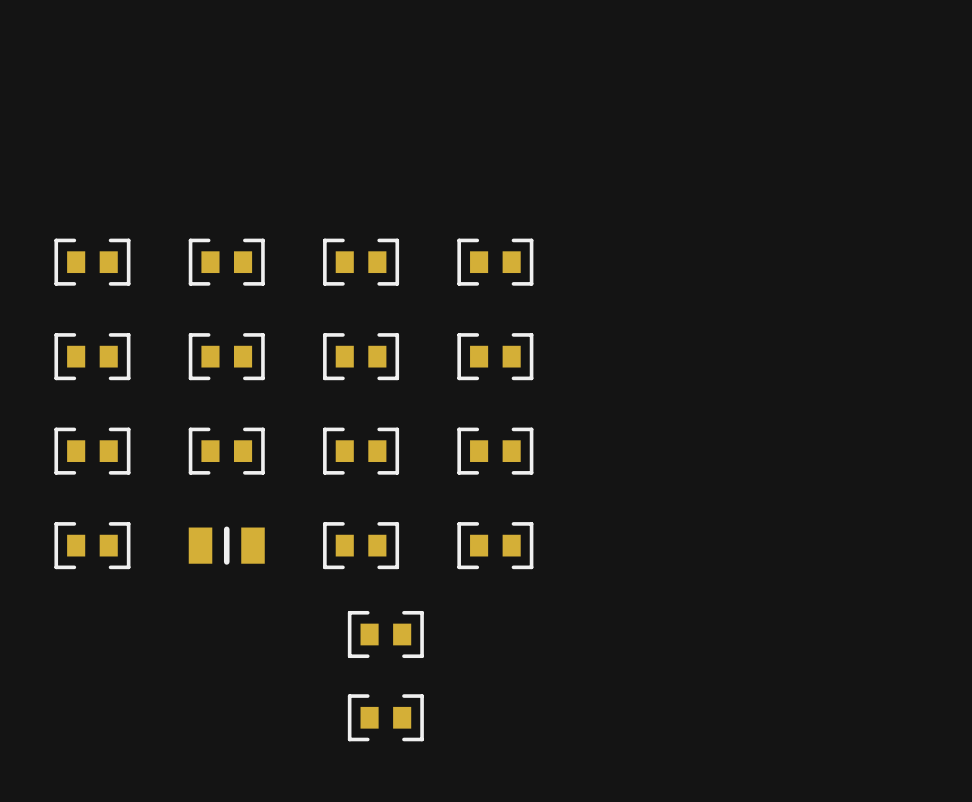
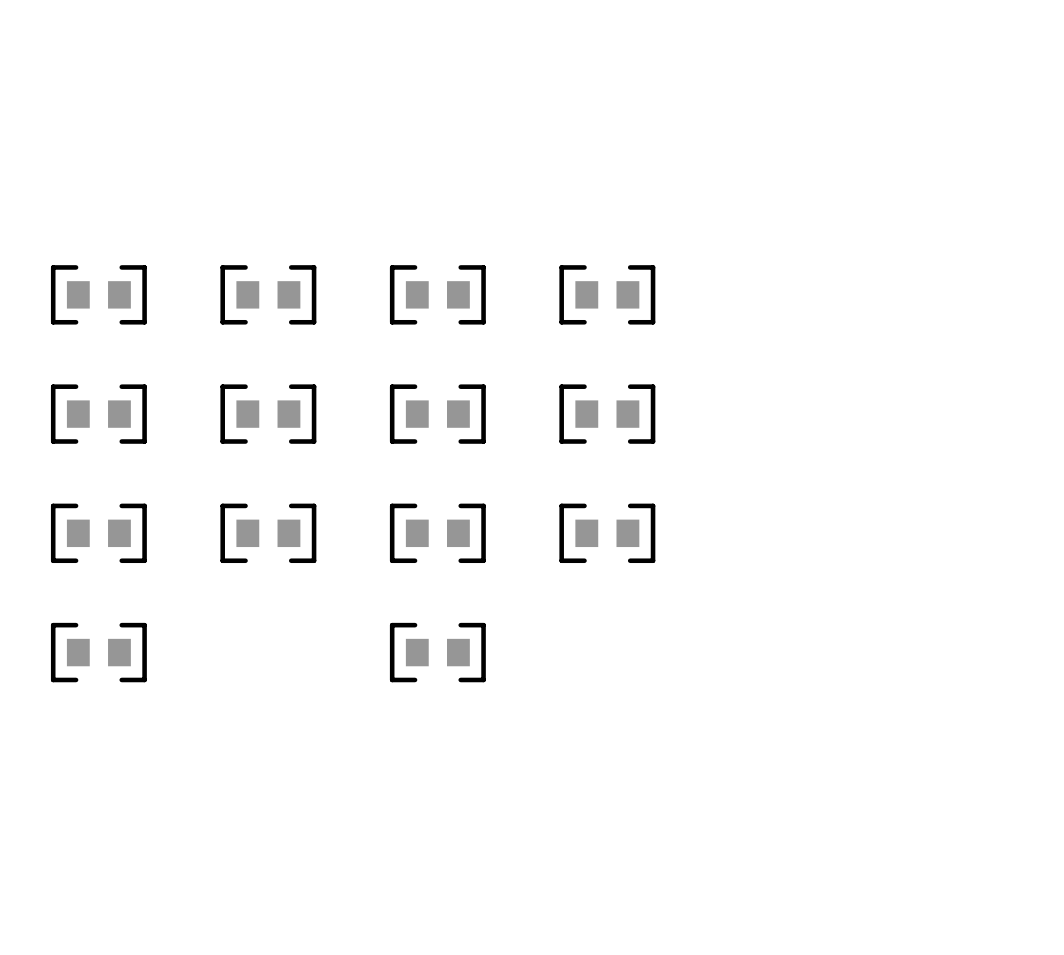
part: (226, 545) -> none
part: (495, 545) -> none
part: (385, 634) -> none
part: (385, 717) -> none

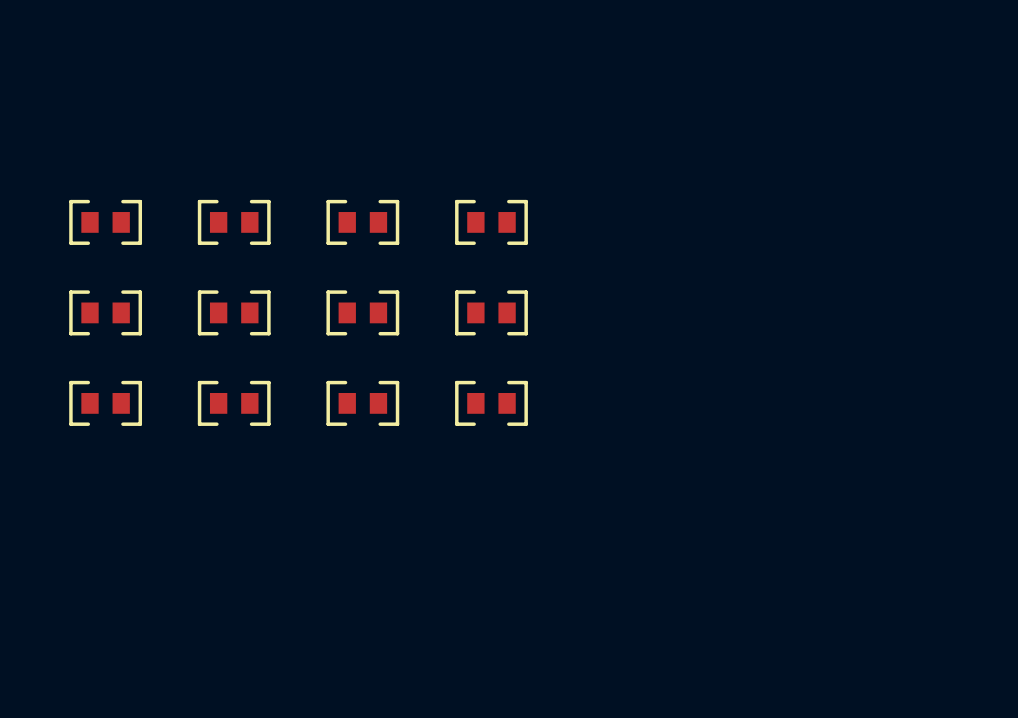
part: (98, 652) -> none
part: (437, 652) -> none

